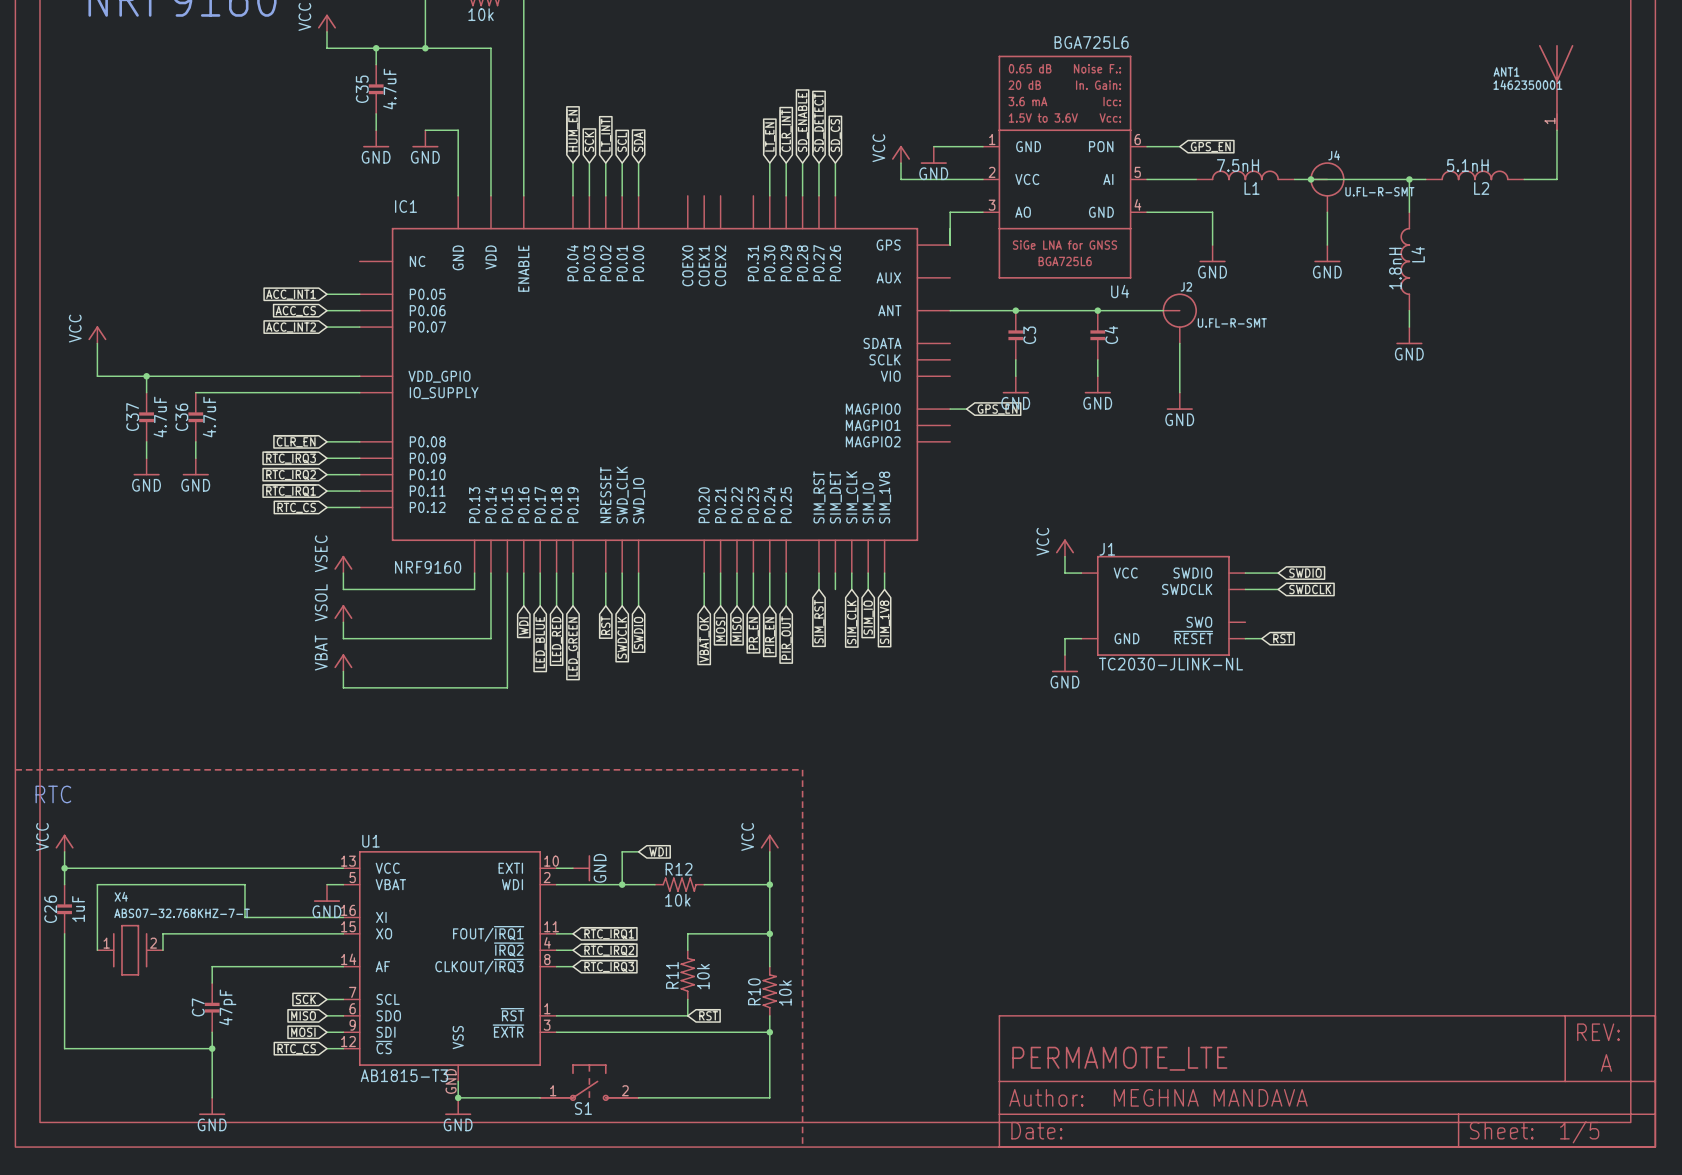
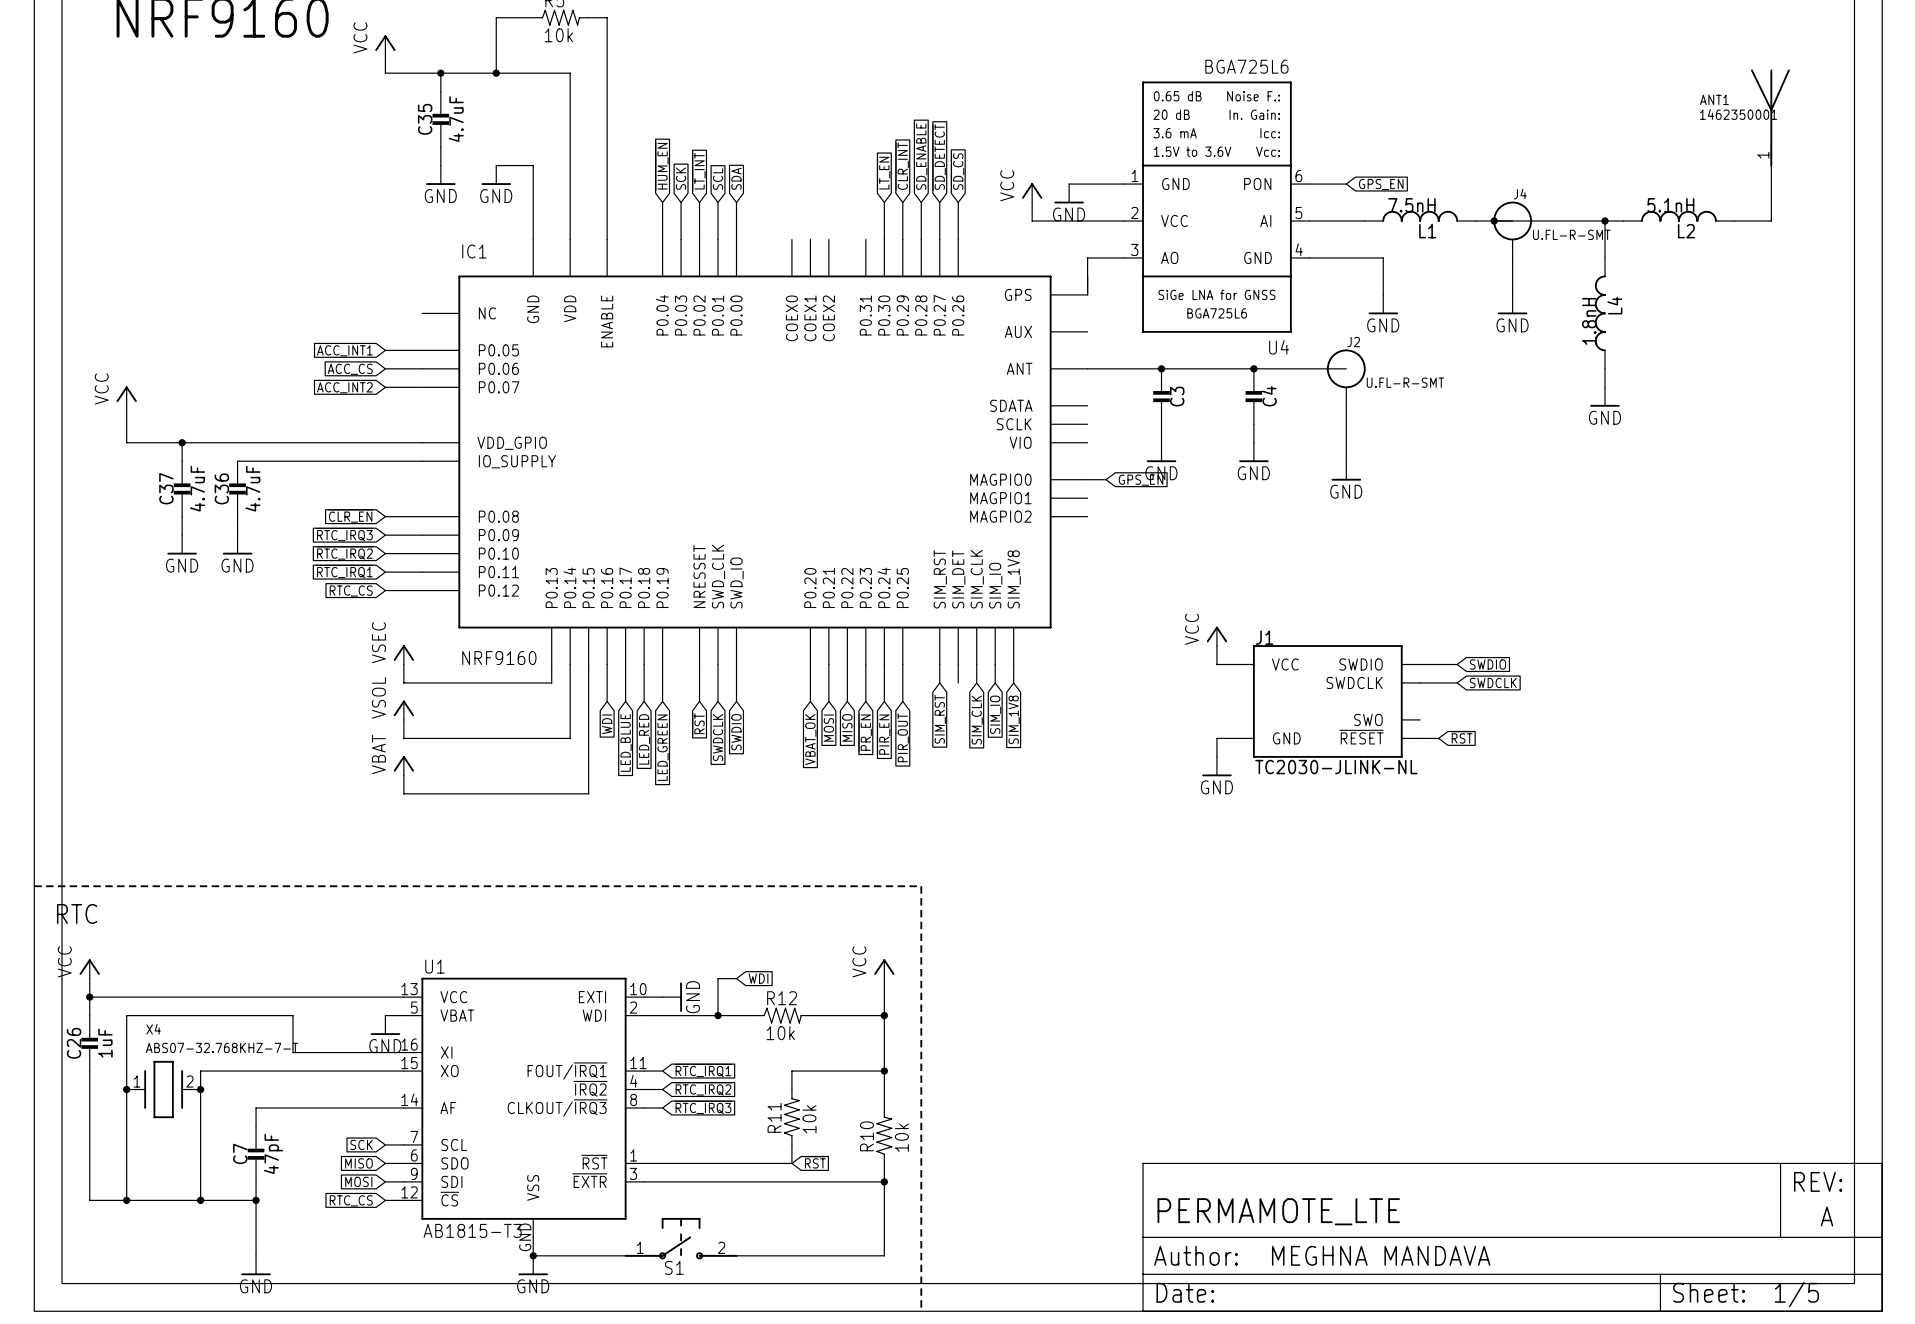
wire: none -> (126, 1089) (126, 1200)
junction: none -> (126, 1089)
wire: none -> (200, 1089) (200, 1200)
junction: none -> (200, 1089)
junction: none -> (126, 1200)
junction: none -> (200, 1200)

